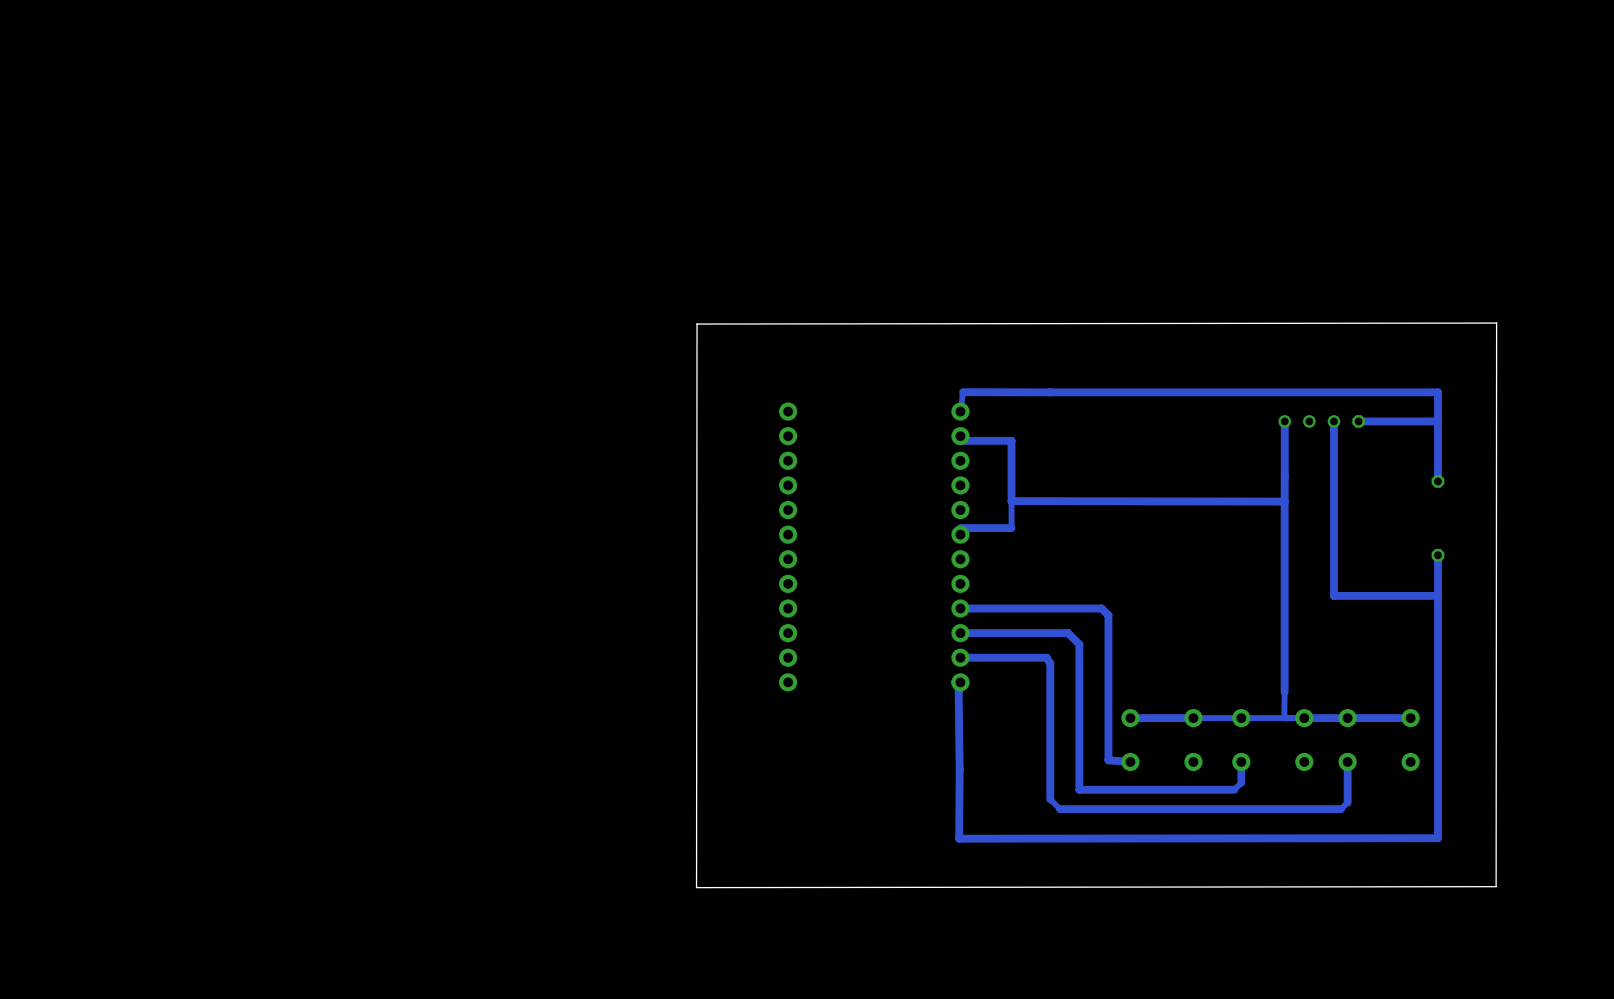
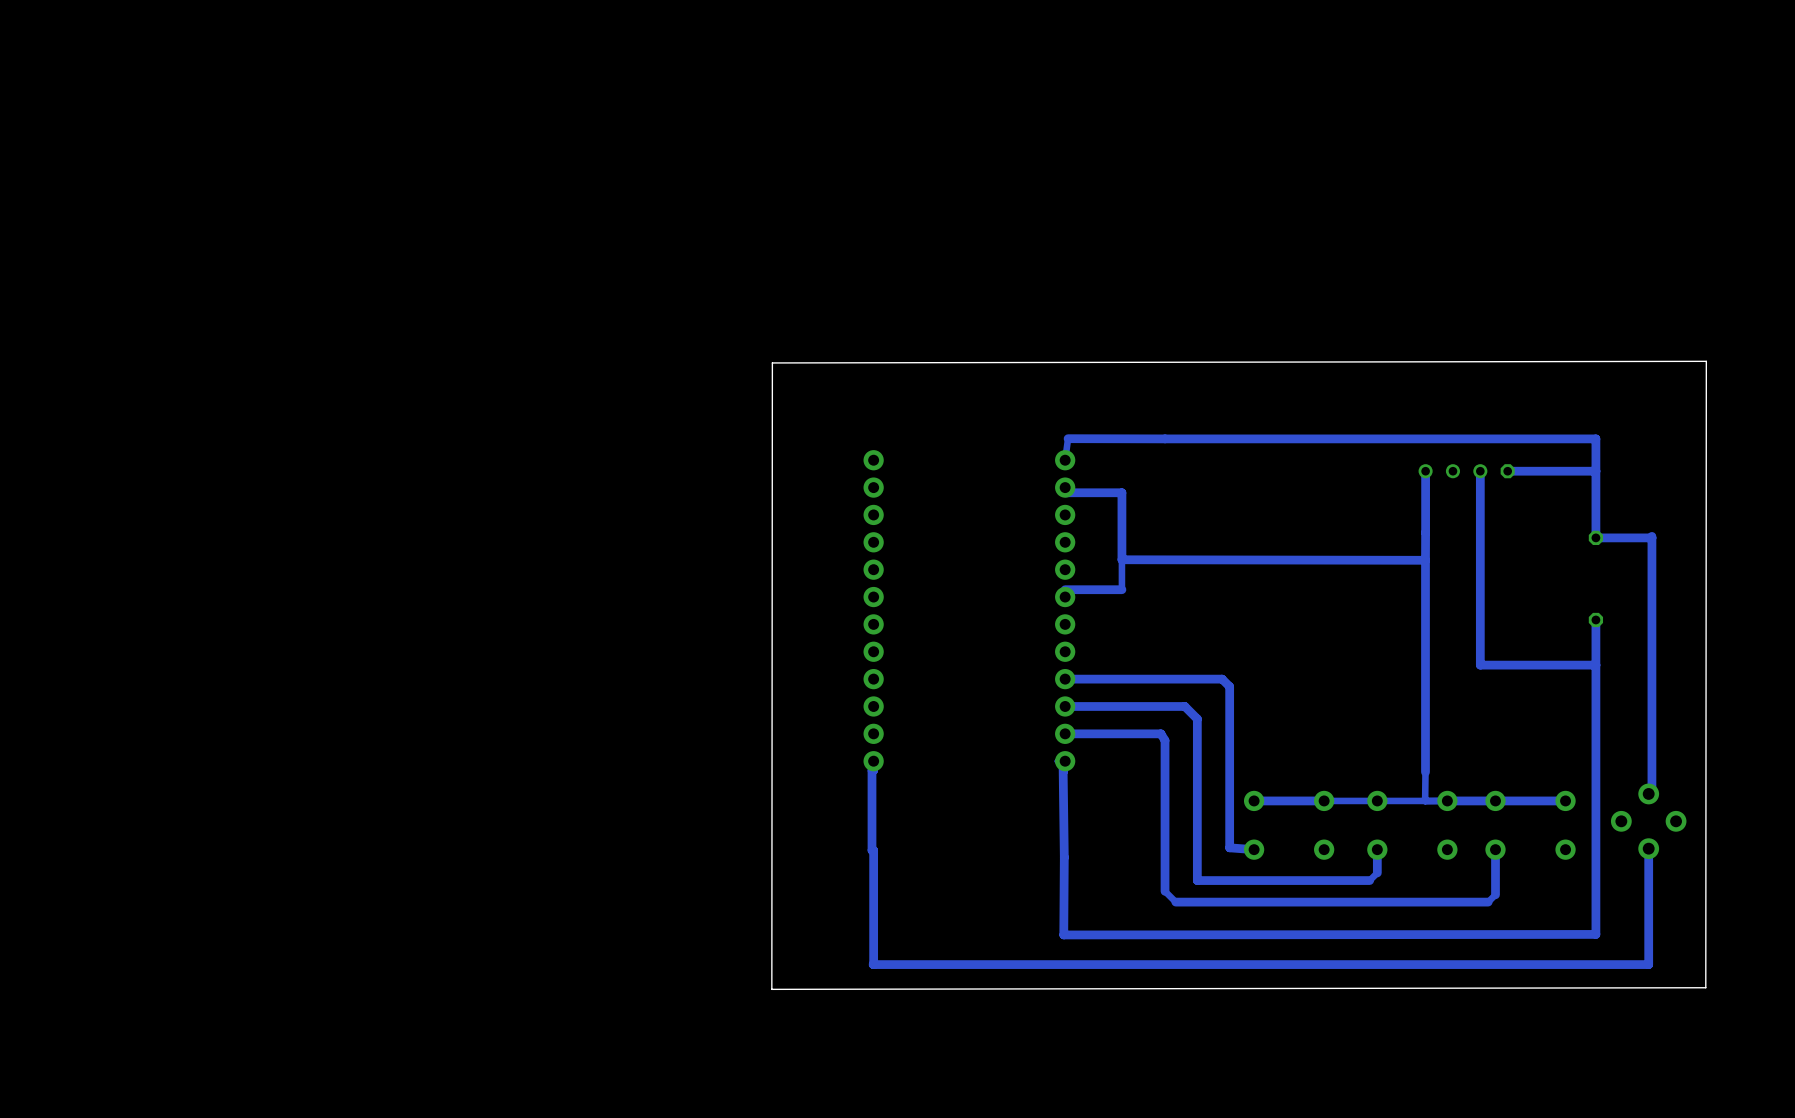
board edge: (697, 324) (1496, 323) (1496, 886) (696, 887) -> (772, 362) (1706, 361) (1705, 987) (771, 989)
bottom track: none -> (1651, 536) (1651, 793) (1648, 793)
bottom track: none -> (1651, 537) (1595, 537)
bottom track: none -> (873, 761) (873, 770) (871, 770) (873, 964)
part: none -> (1648, 821)
bottom track: none -> (1648, 848) (1648, 964) (873, 964)

